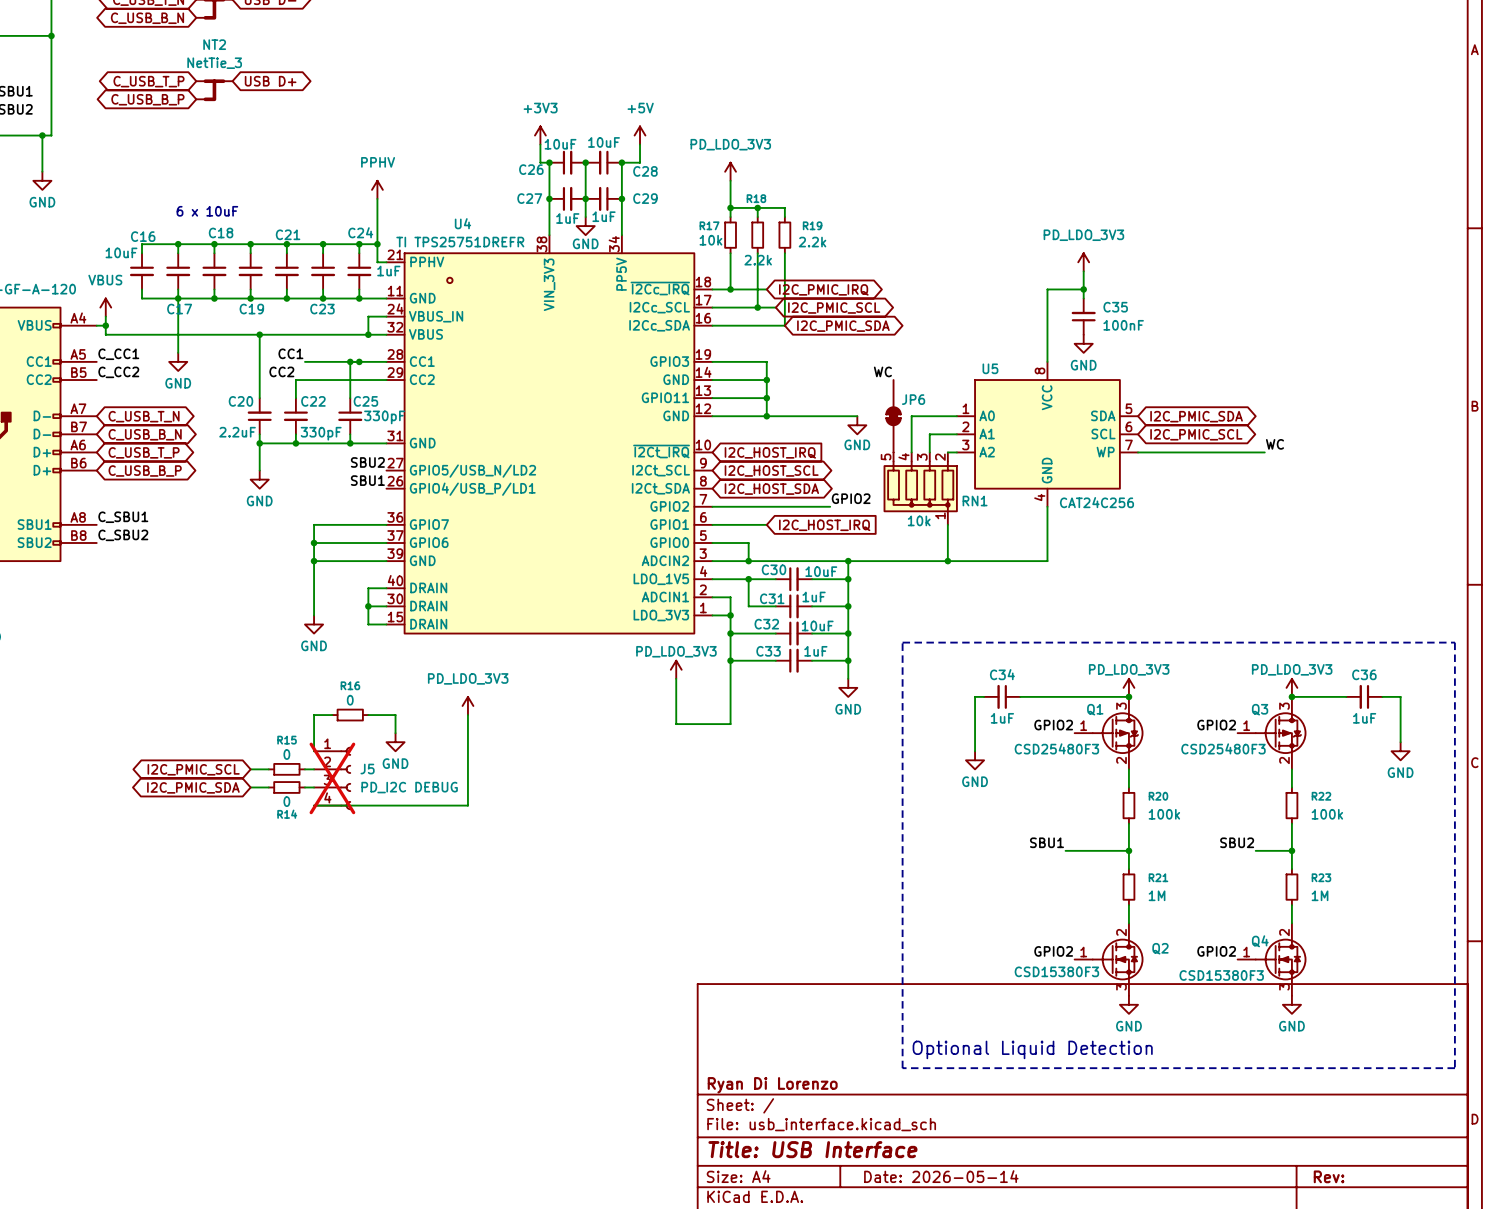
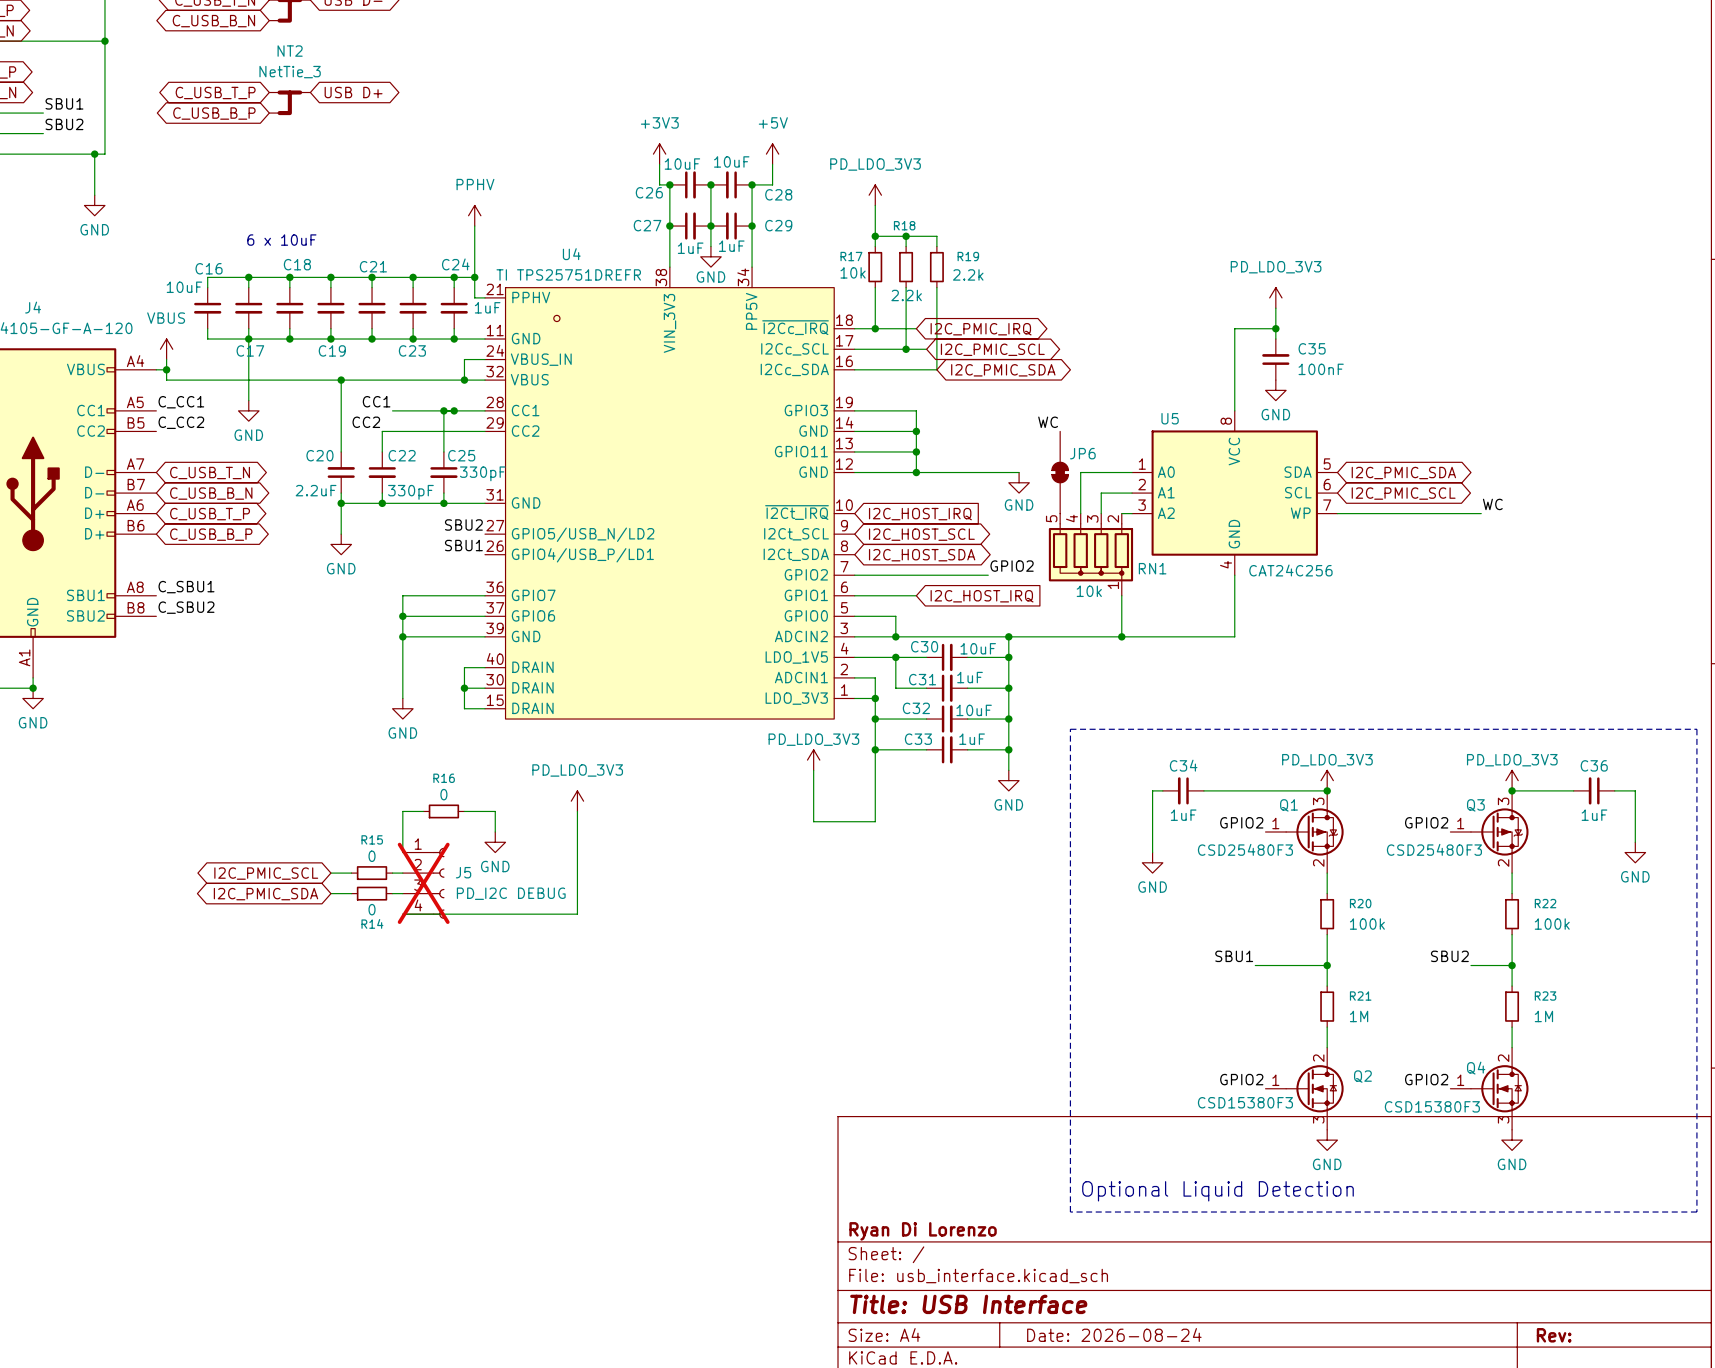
title block: Date: 2026-05-14 (941, 1176) -> Date: 2026-08-24 (1114, 1335)

